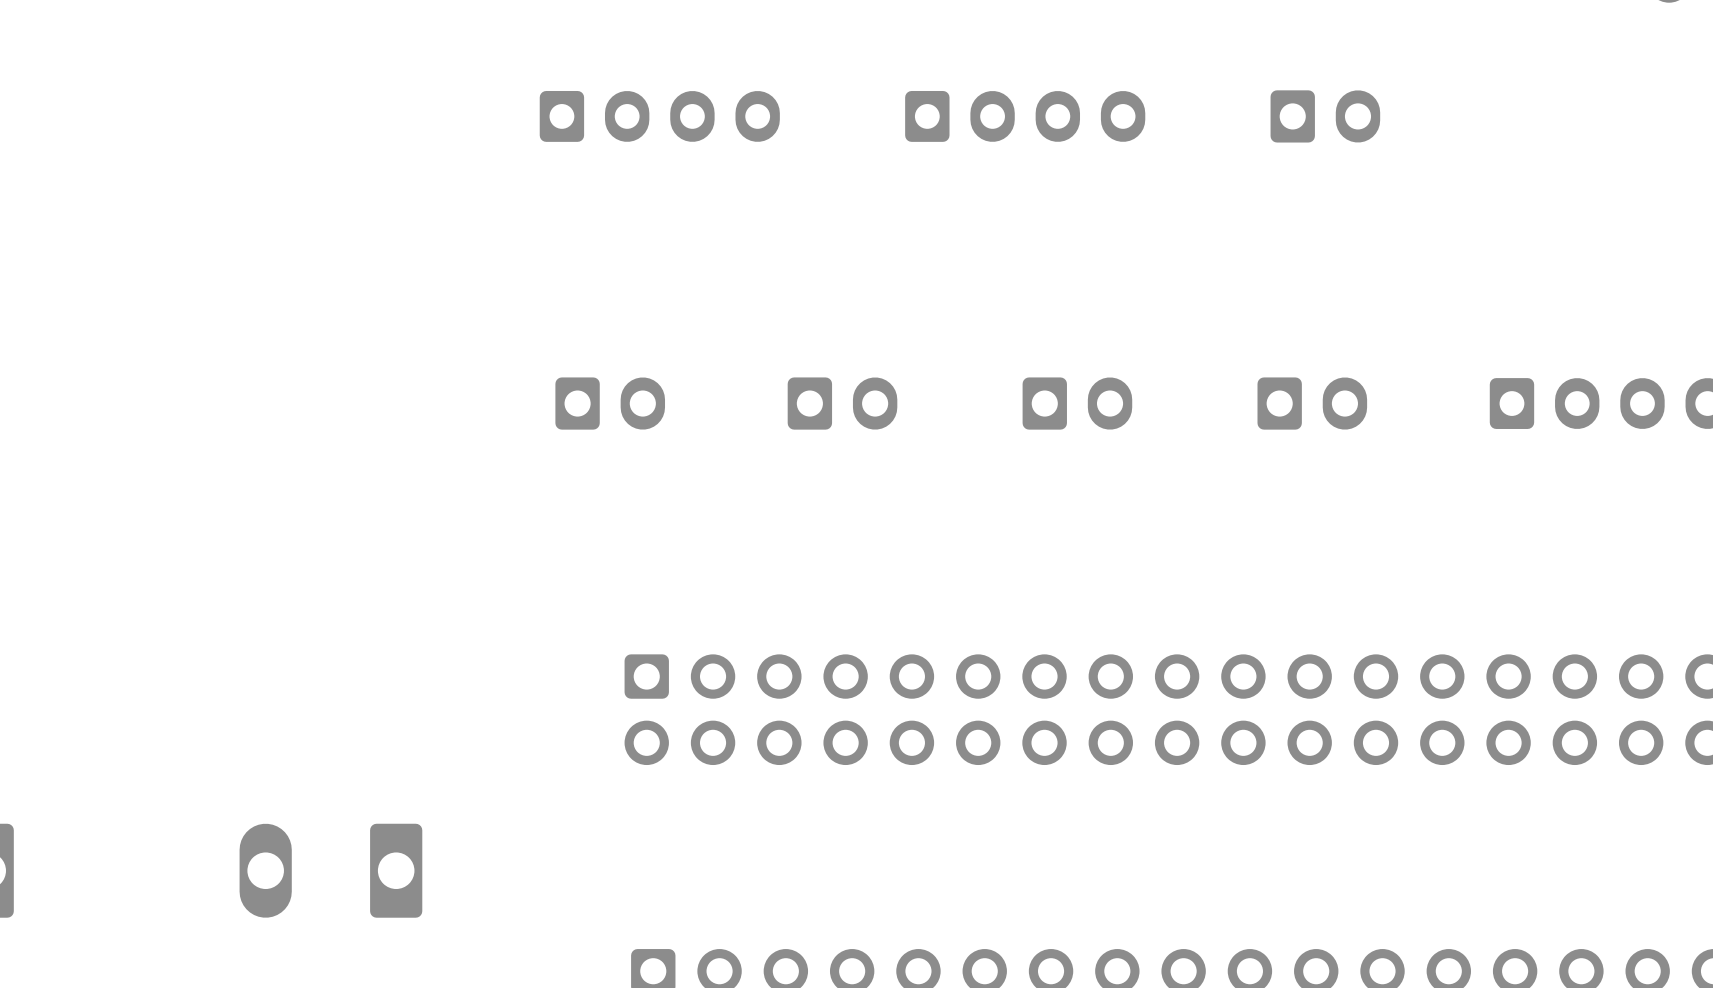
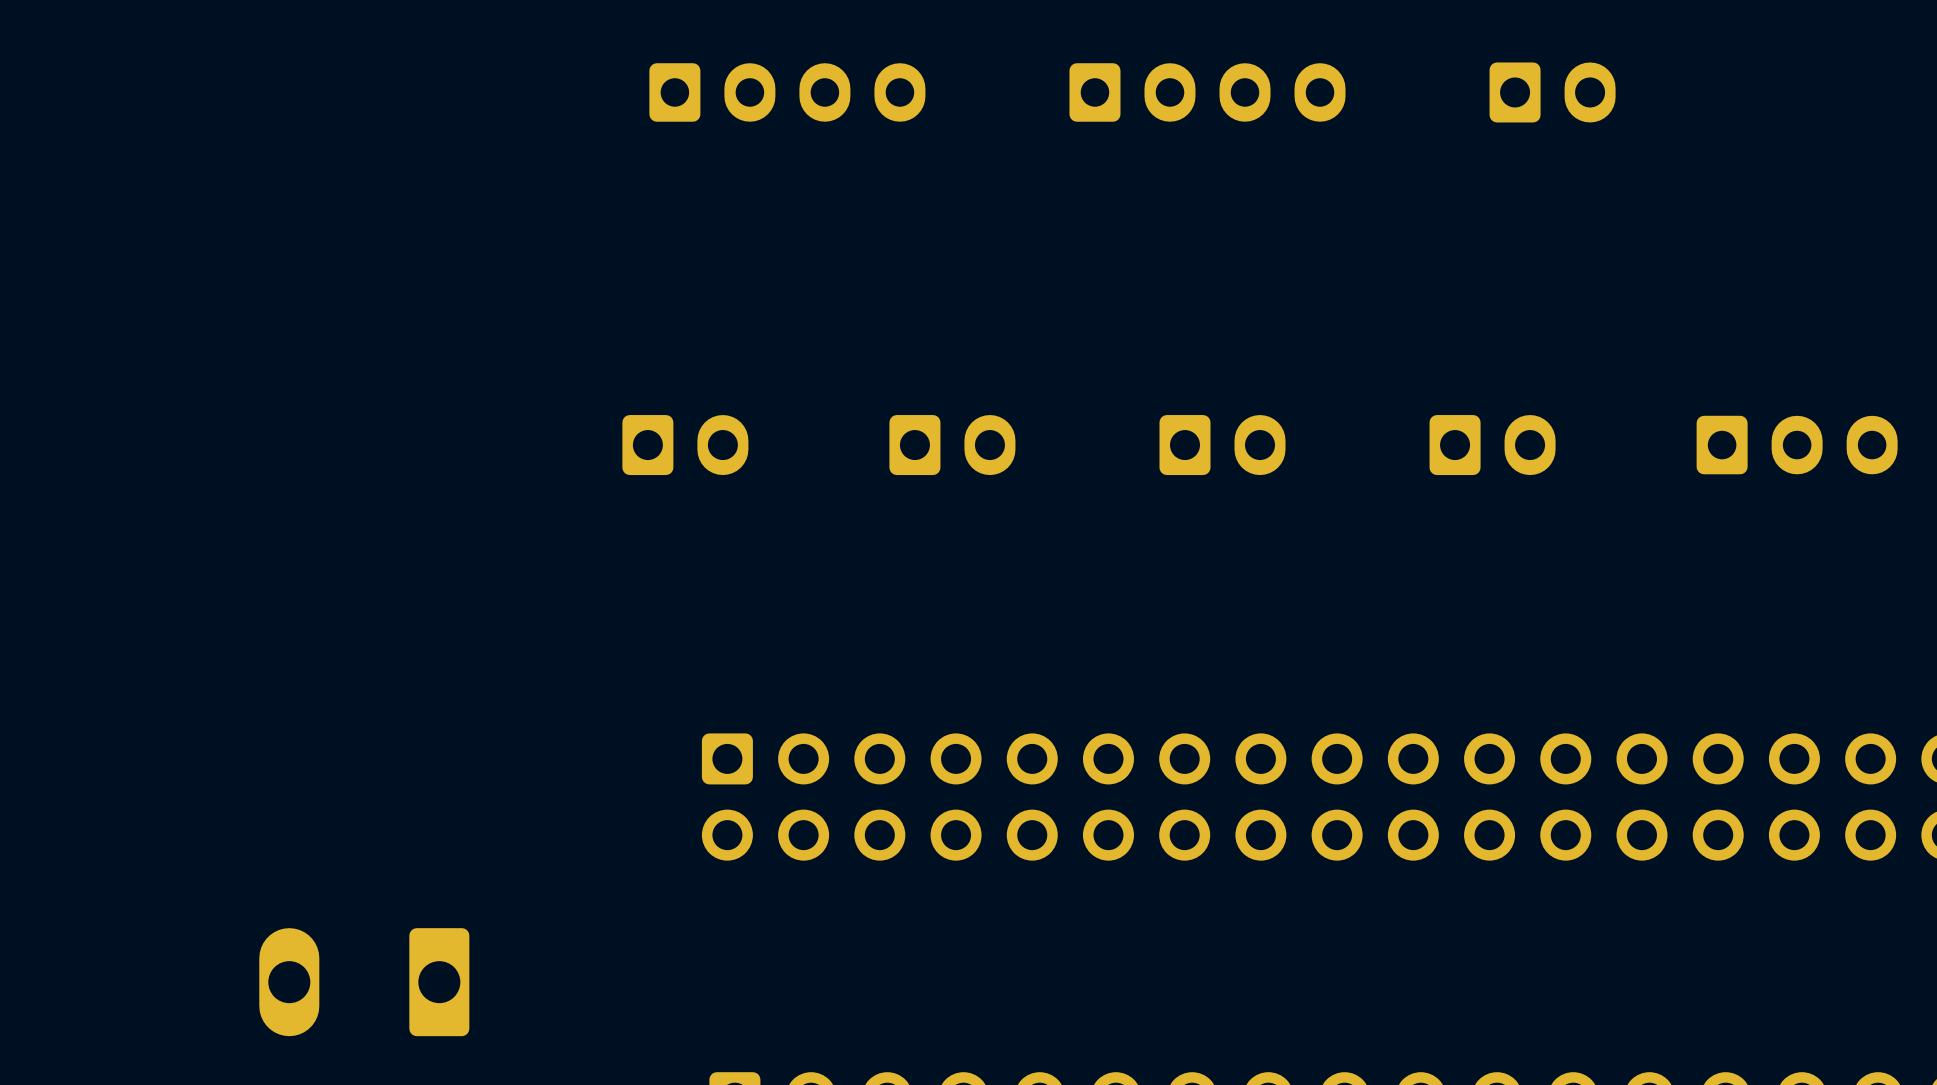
part position: (659, 116) -> (787, 92)
part position: (1025, 116) -> (1207, 92)
part position: (1325, 116) -> (1552, 92)

